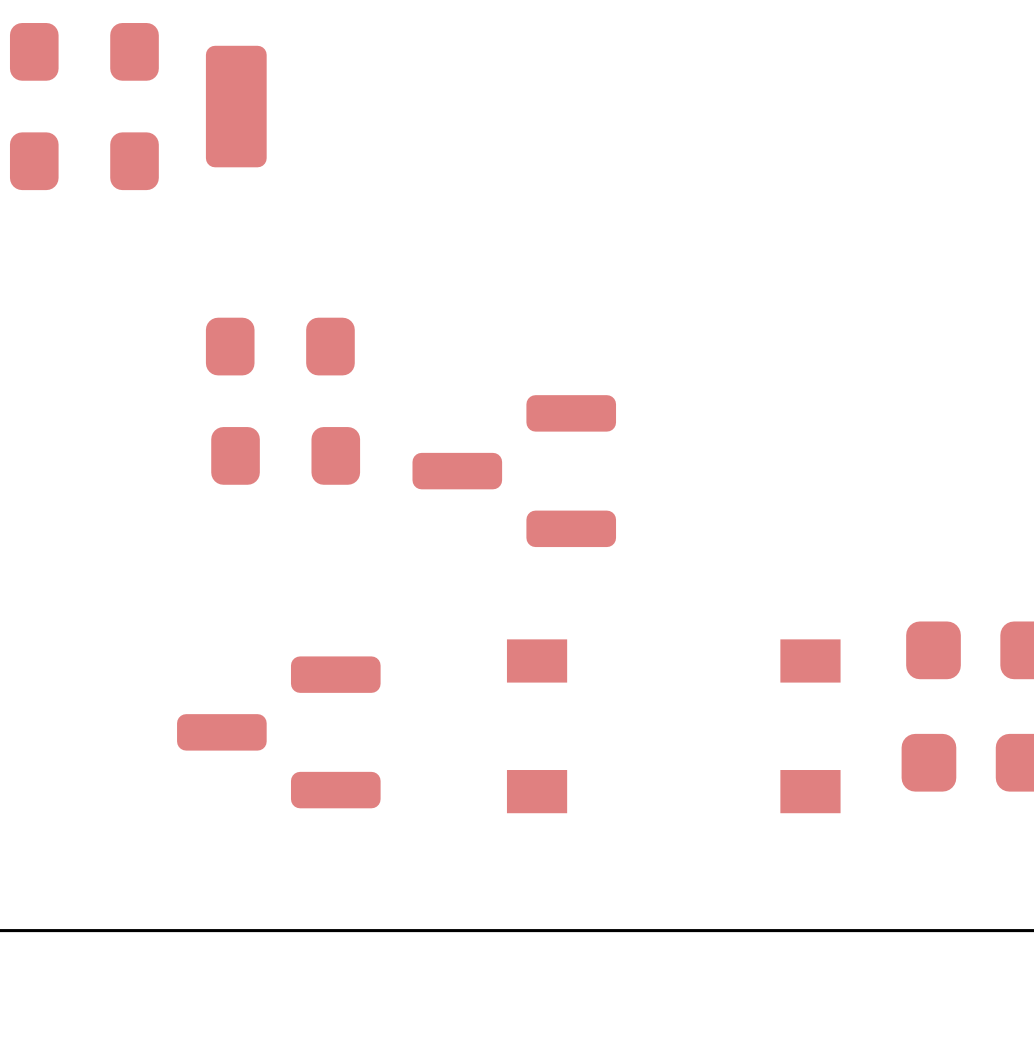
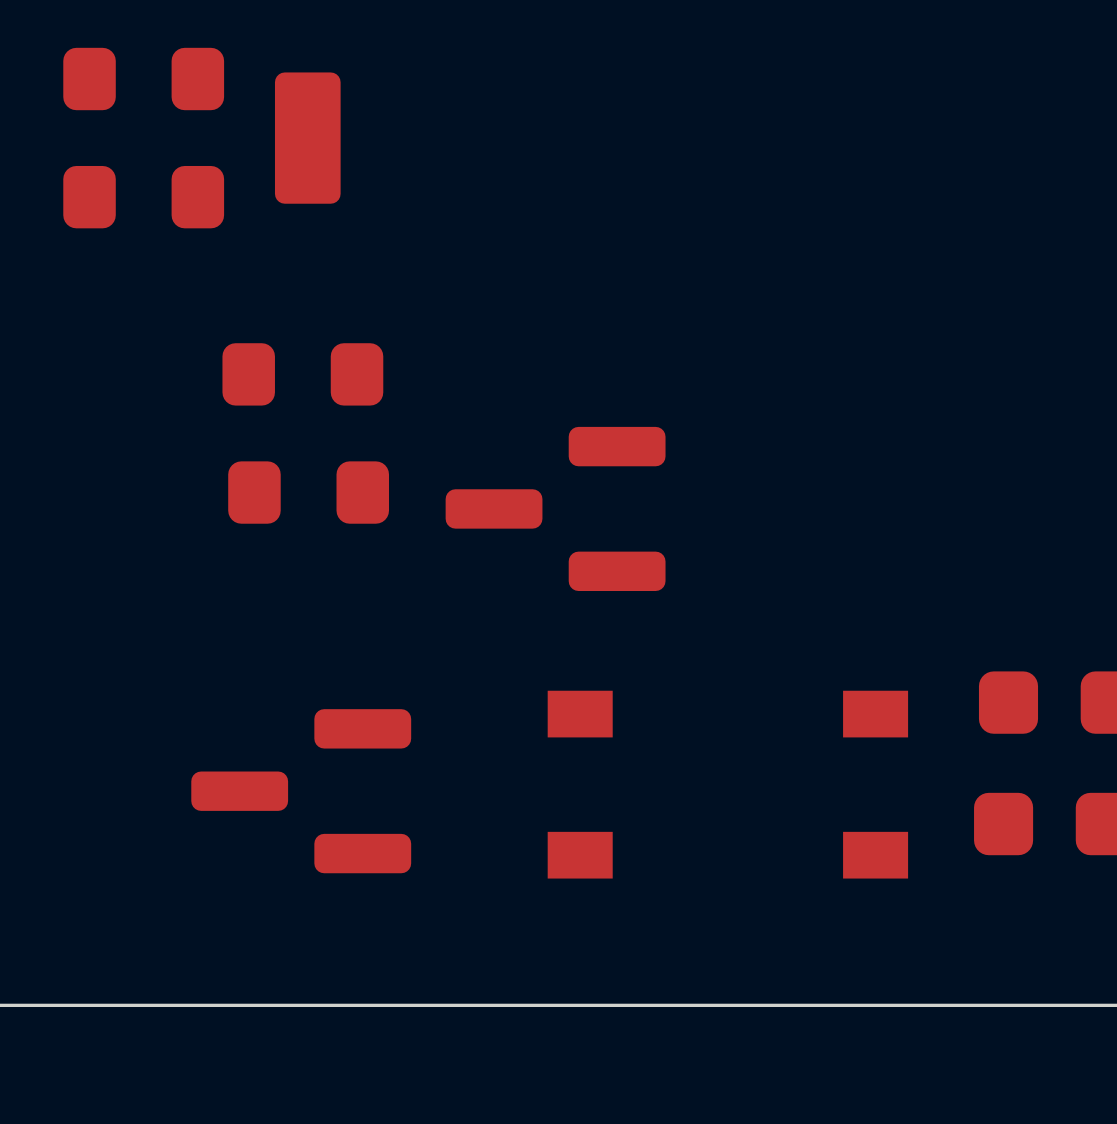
part: (84, 51) -> none
part: none -> (143, 79)
part position: (236, 106) -> (307, 138)
part: (84, 161) -> none
part: none -> (143, 197)

